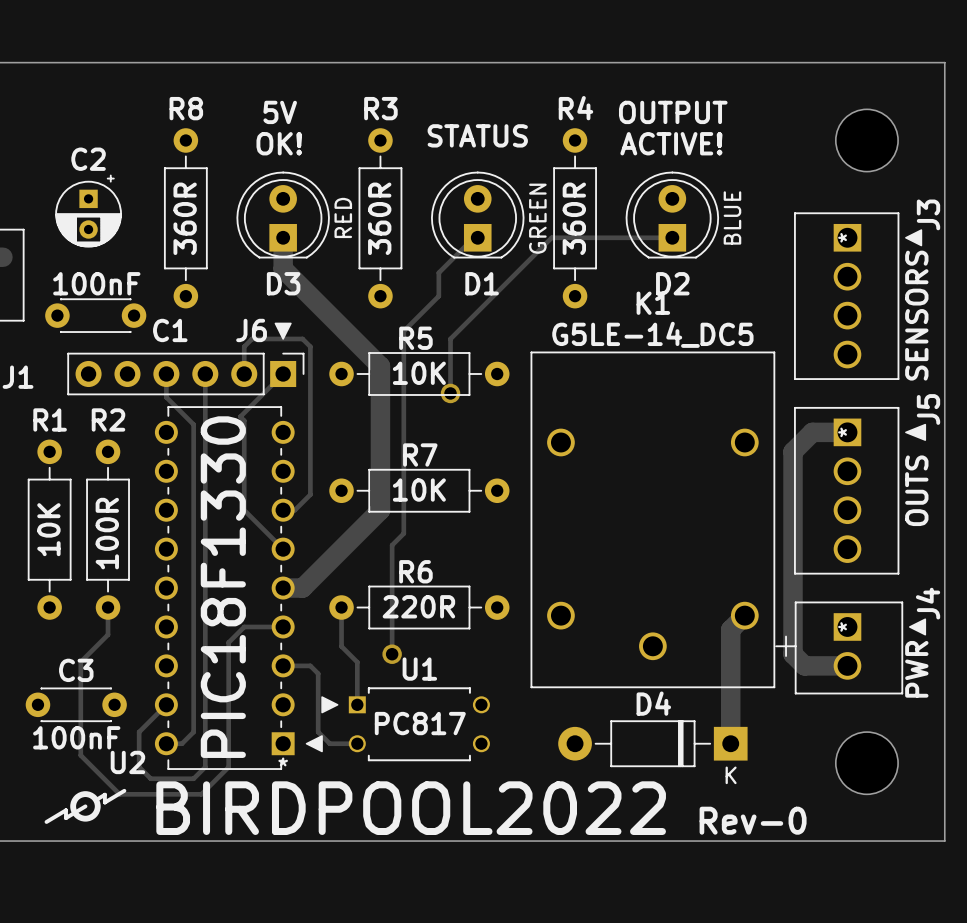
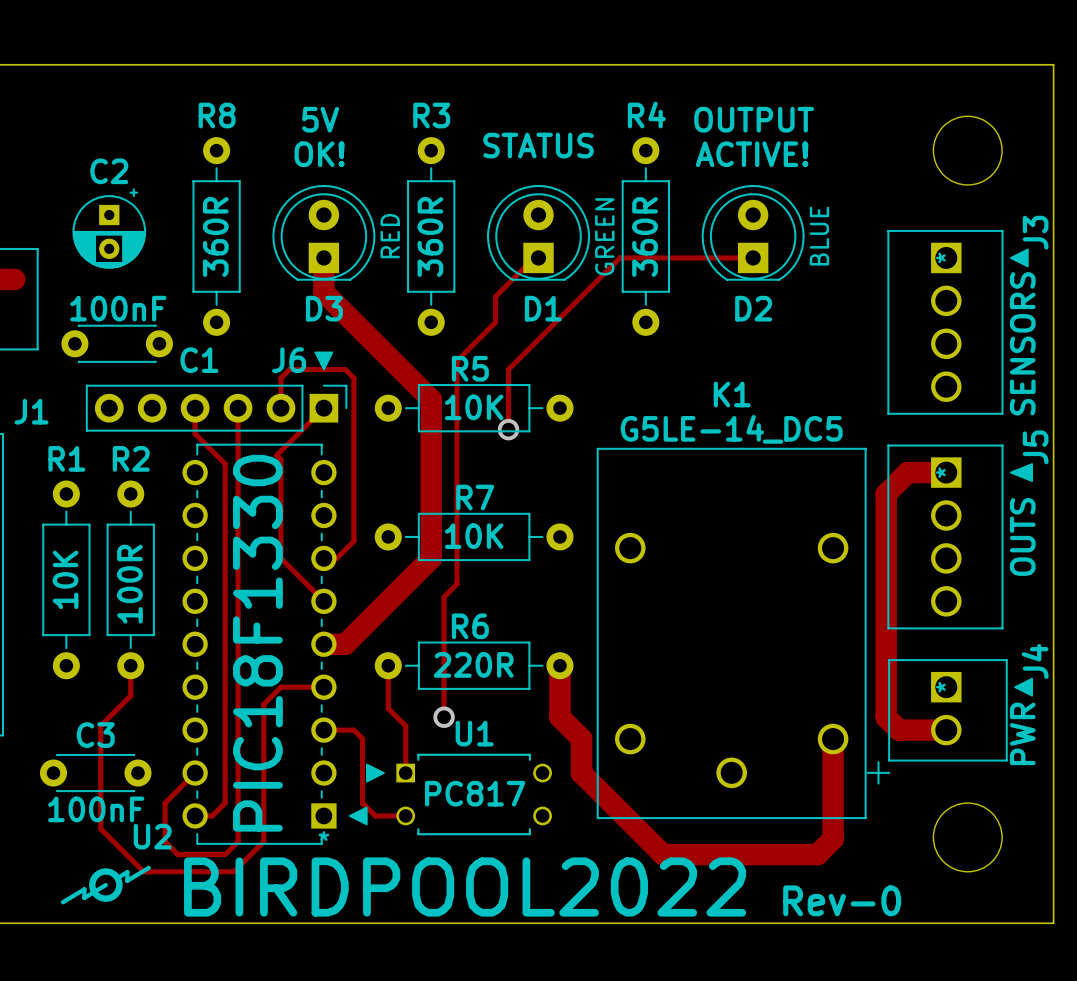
K1 position: (663, 519) -> (743, 633)
track: none -> (559, 668) (559, 717) (581, 738) (581, 773) (663, 854) (817, 854) (833, 839) (833, 739)
track: (744, 615) (730, 629) (730, 743) -> none
D4: (652, 743) -> none

